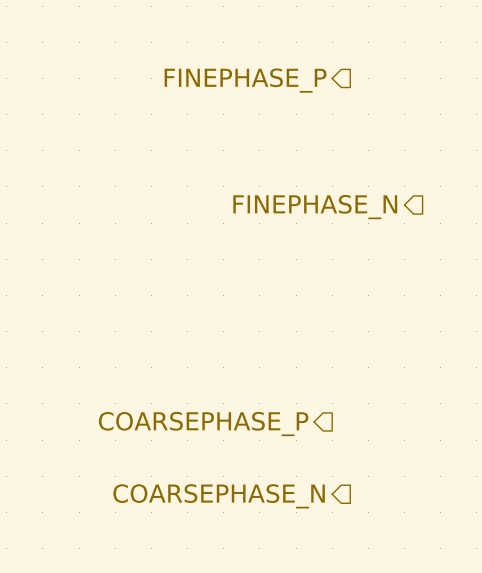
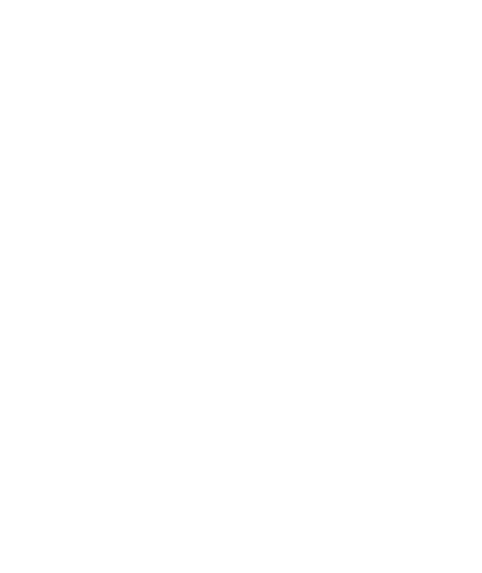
hierarchical label: FINEPHASE_P (245, 80) -> none
hierarchical label: FINEPHASE_N (315, 207) -> none
hierarchical label: COARSEPHASE_P (203, 424) -> none
hierarchical label: COARSEPHASE_N (219, 496) -> none

